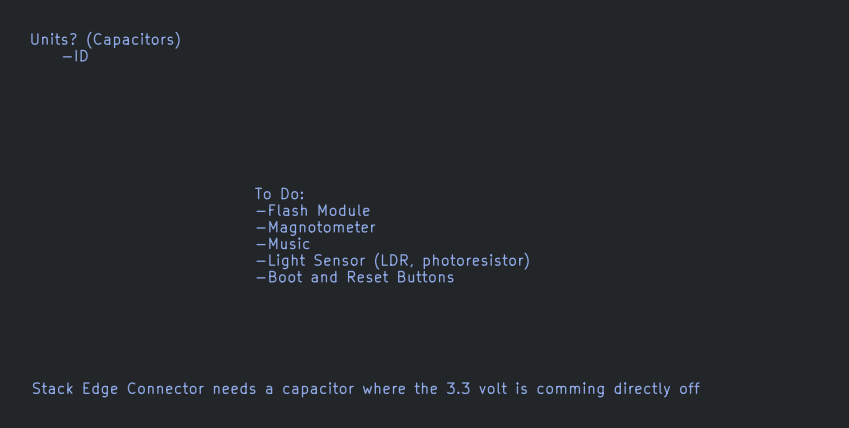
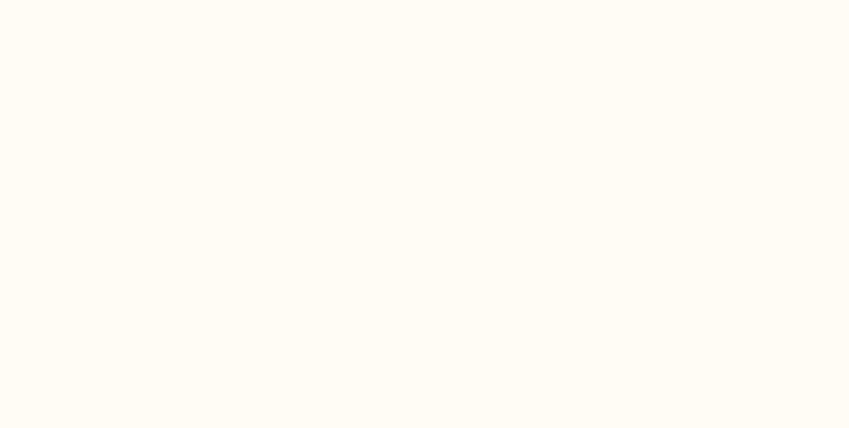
text: Units? (Capacitors) (105, 40) -> none
text: -ID (75, 55) -> none
text: To Do: (278, 193) -> none
text: -Flash Module (312, 210) -> none
text: -Magnotometer (315, 228) -> none
text: -Music (282, 243) -> none
text: -Light Sensor (LDR, photoresistor) (392, 261) -> none
text: -Boot and Reset Buttons (354, 276) -> none
text: Stack Edge Connector needs a capacitor where the 3.3 volt is comming directly off (366, 389) -> none

